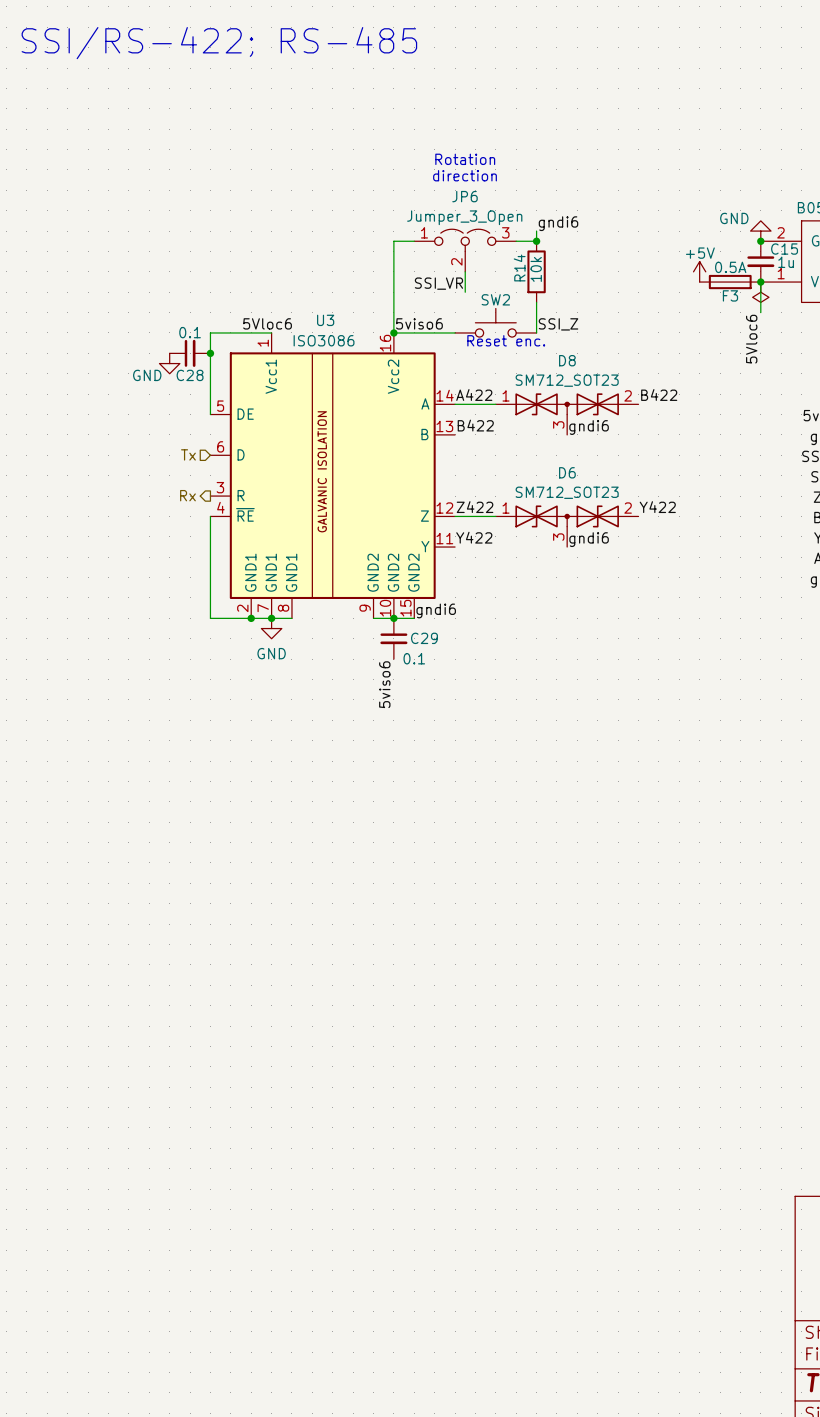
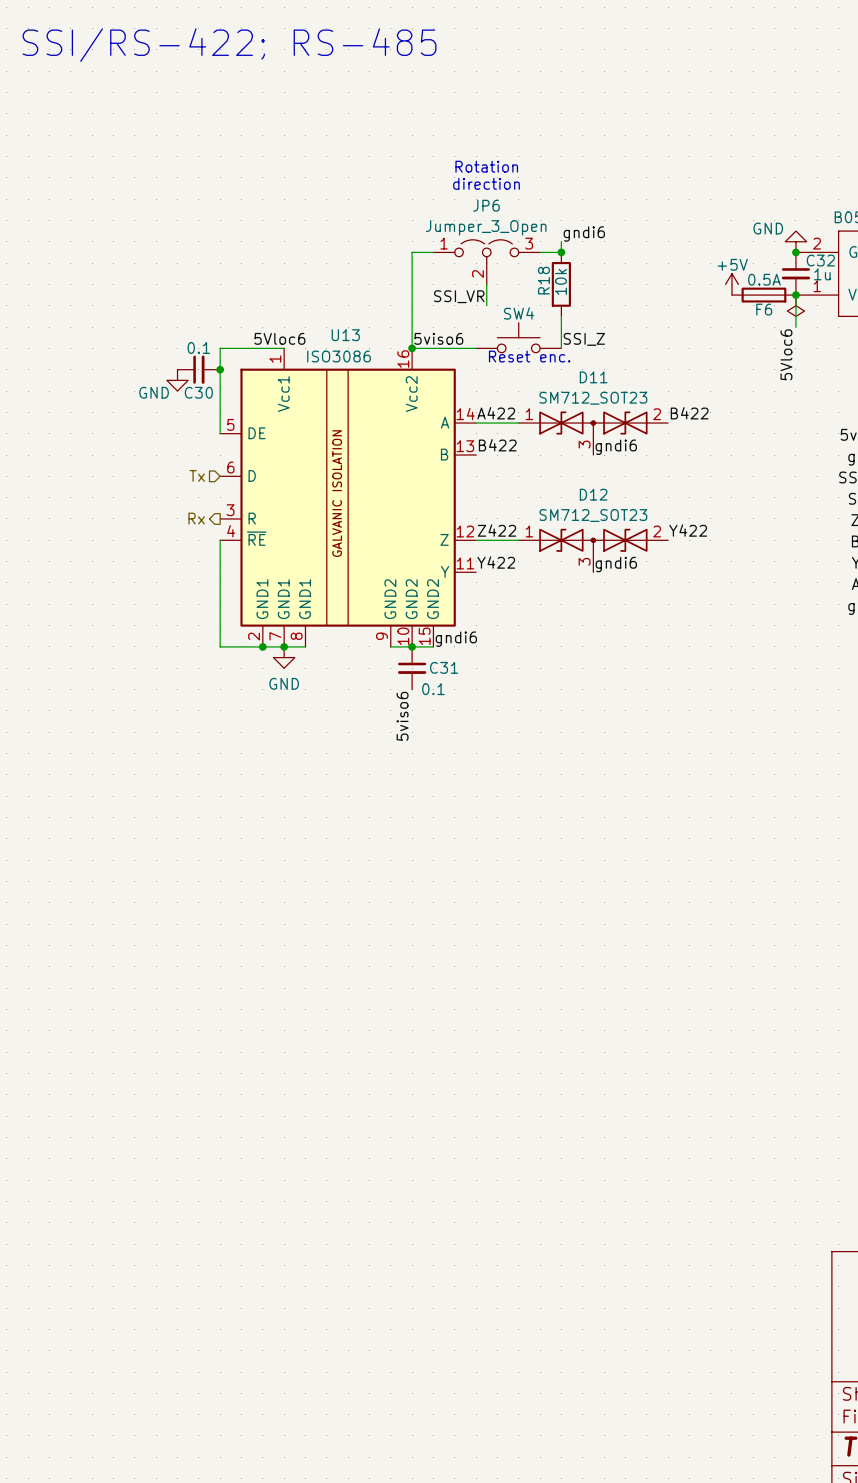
C15 name: C15 (784, 249) -> C32 (820, 260)
R14 name: R14 (519, 267) -> R18 (543, 280)
F3 name: F3 (730, 295) -> F6 (764, 309)
SW2 name: SW2 (495, 299) -> SW4 (518, 313)
U3 name: U3 (325, 320) -> U13 (345, 335)
D8 name: D8 (567, 360) -> D11 (593, 377)
C28 name: C28 (190, 375) -> C30 (198, 392)
D6 name: D6 (567, 472) -> D12 (593, 494)
C29 name: C29 (424, 638) -> C31 (444, 667)

